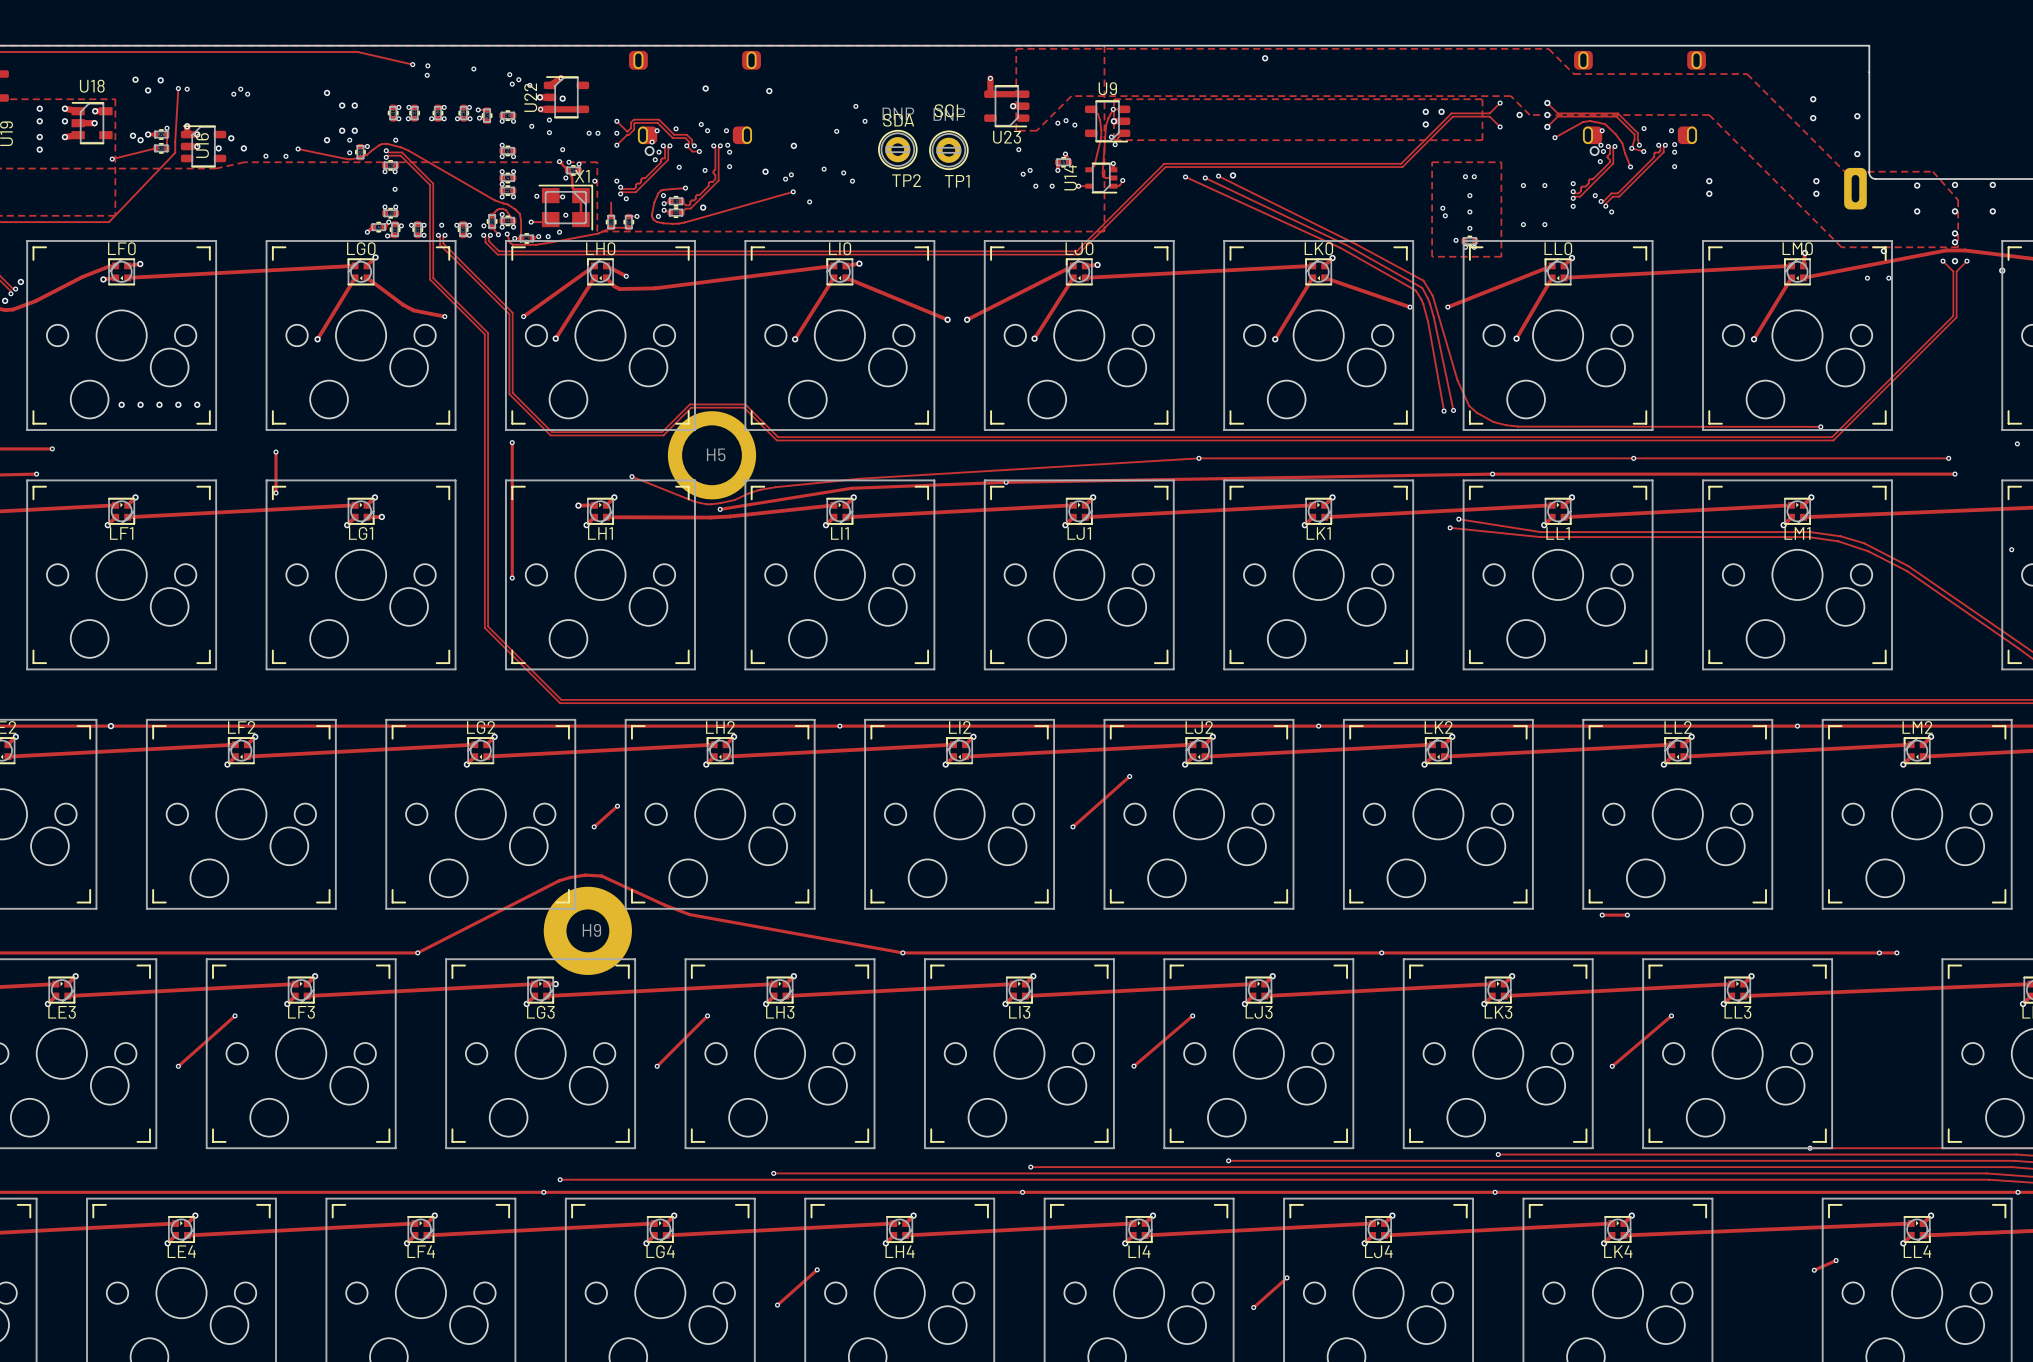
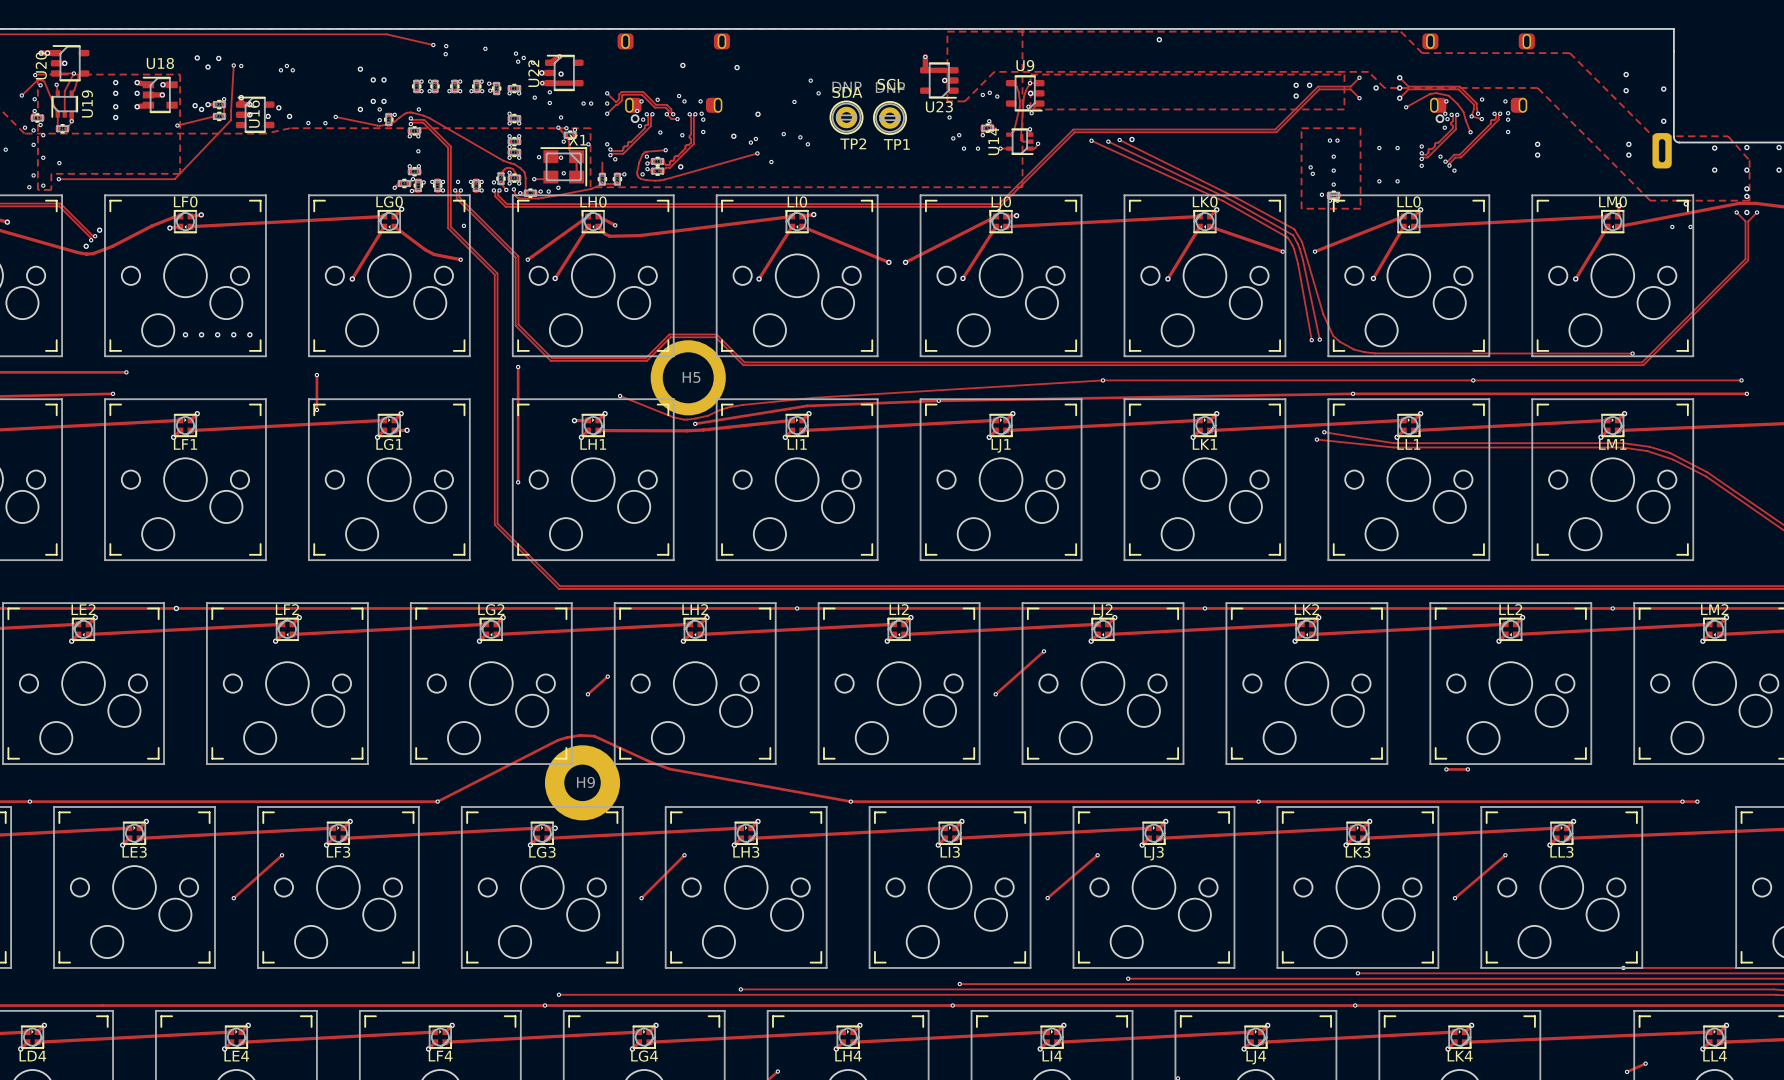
via: none -> (463, 225)

